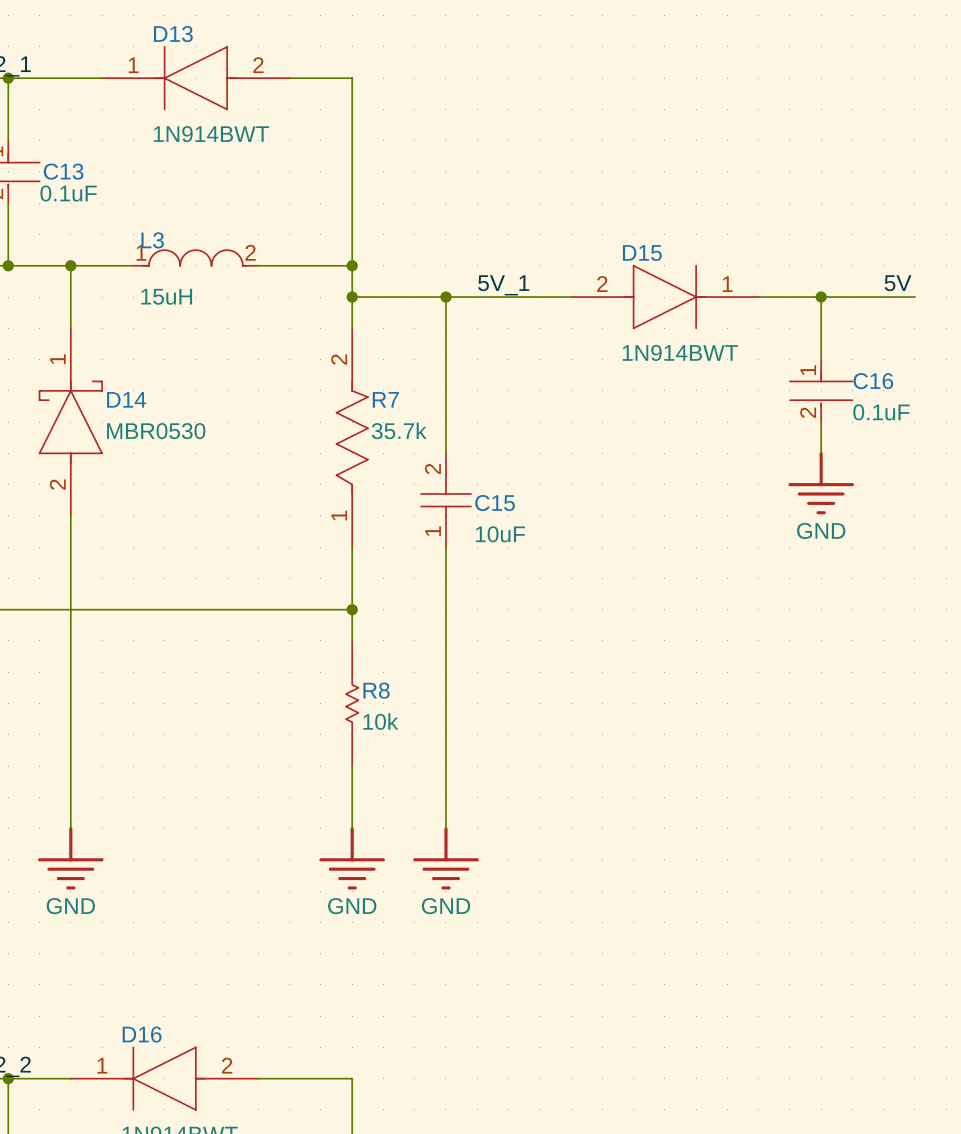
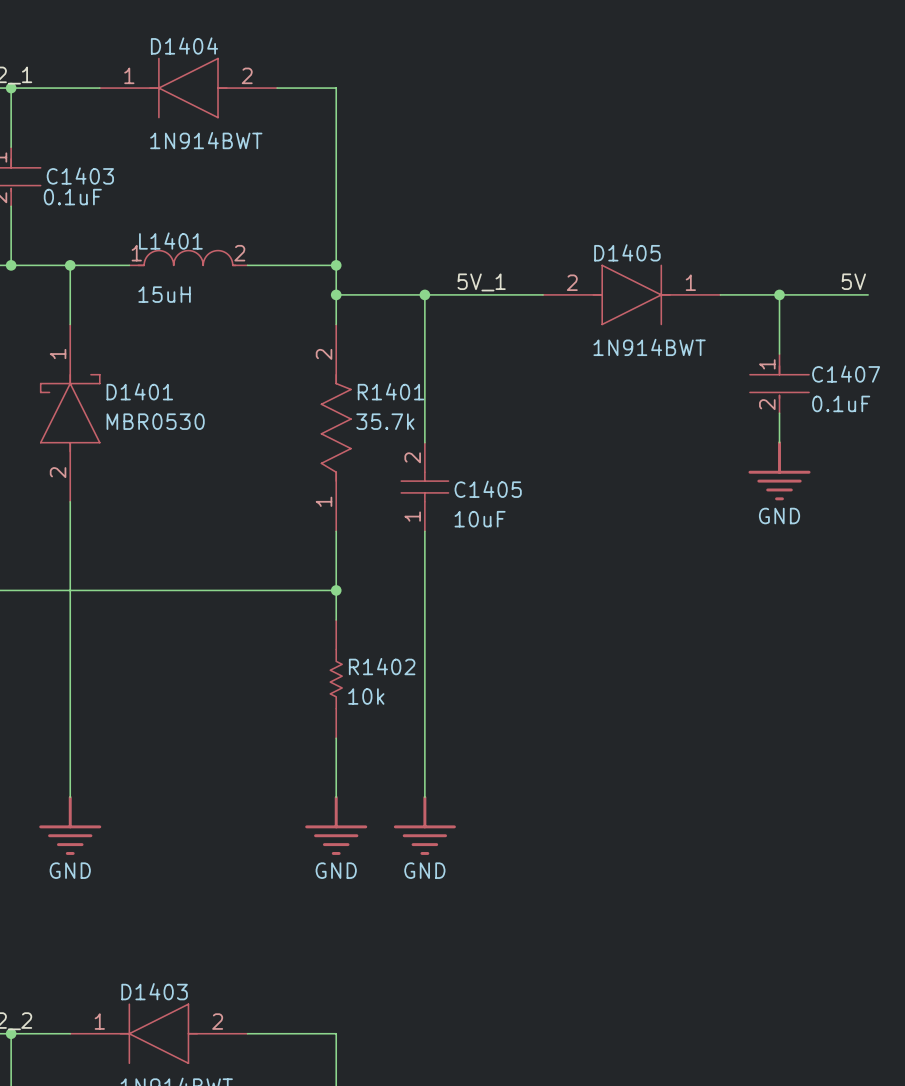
D13 name: D13 (173, 34) -> D1404 (184, 46)
C13 name: C13 (63, 171) -> C1403 (80, 176)
L3 name: L3 (152, 240) -> L1401 (170, 241)
D15 name: D15 (642, 253) -> D1405 (627, 252)
C16 name: C16 (873, 381) -> C1407 (846, 374)
D14 name: D14 (126, 399) -> D1401 (139, 391)
R7 name: R7 (385, 399) -> R1401 (391, 391)
C15 name: C15 (495, 503) -> C1405 (488, 489)
R8 name: R8 (376, 690) -> R1402 (382, 666)
D16 name: D16 (142, 1034) -> D1403 (154, 991)

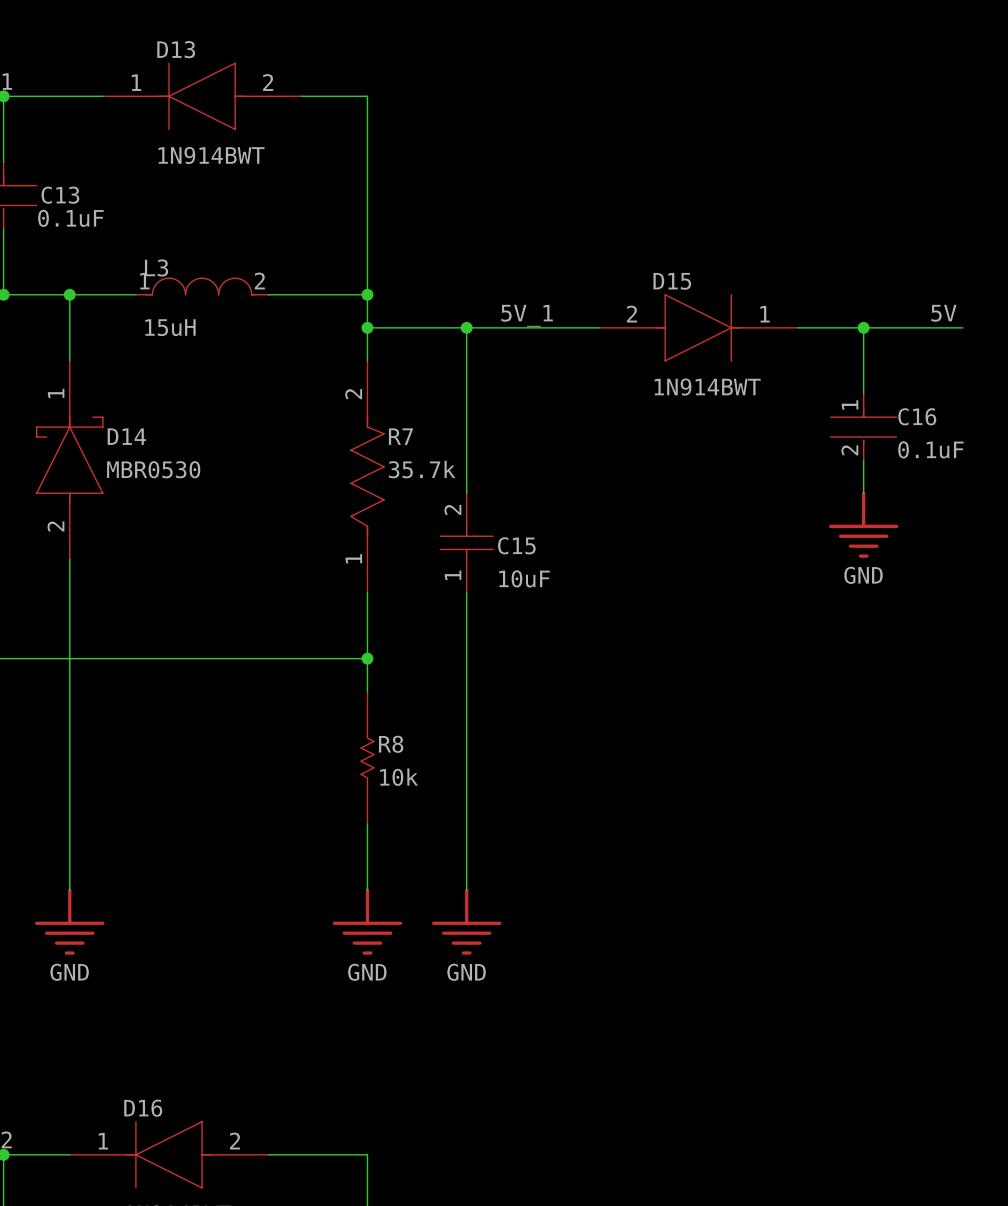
D1404 name: D1404 (184, 46) -> D13 (176, 49)
C1403 name: C1403 (80, 176) -> C13 (60, 195)
L1401 name: L1401 (170, 241) -> L3 (156, 267)
D1405 name: D1405 (627, 252) -> D15 (672, 281)
C1407 name: C1407 (846, 374) -> C16 (917, 416)
D1401 name: D1401 (139, 391) -> D14 (126, 436)
R1401 name: R1401 (391, 391) -> R7 (400, 436)
C1405 name: C1405 (488, 489) -> C15 (516, 545)
R1402 name: R1402 (382, 666) -> R8 (391, 744)
D1403 name: D1403 (154, 991) -> D16 (143, 1108)

